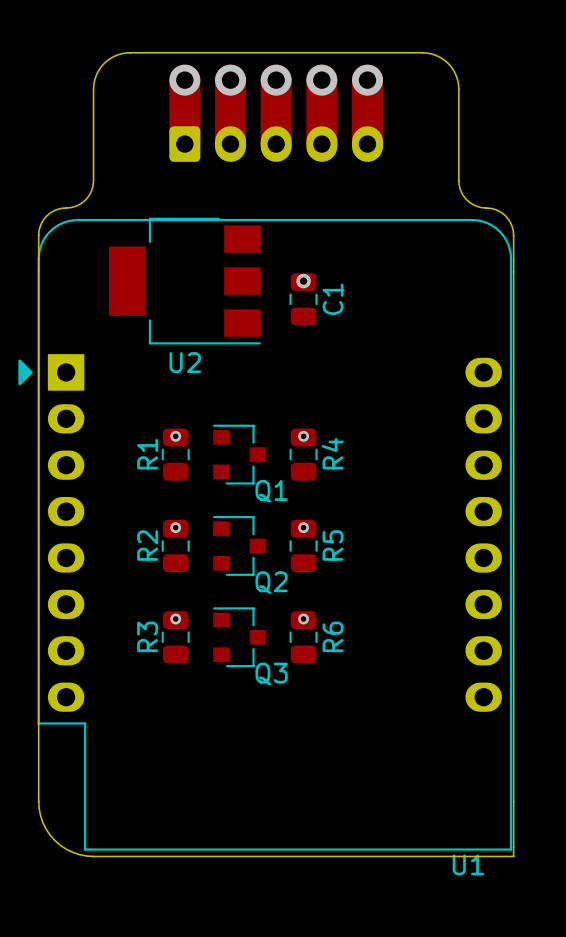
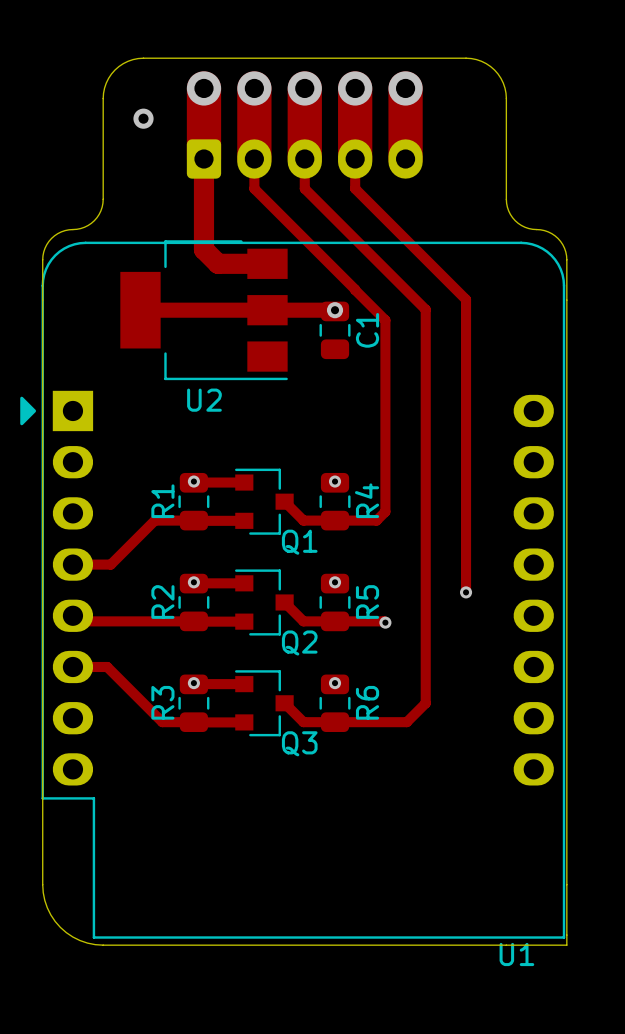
via: none -> (143, 118)
track: none -> (203, 159) (203, 249) (218, 263) (267, 263)
track: none -> (254, 159) (254, 188) (385, 320) (385, 511) (376, 520) (303, 520) (284, 501)
track: none -> (304, 159) (304, 188) (425, 309) (425, 703) (406, 722) (303, 722) (284, 703)
track: none -> (355, 159) (355, 188) (466, 299) (466, 592)
track: none -> (140, 310) (335, 310)
track: none -> (194, 482) (244, 482)
track: none -> (193, 520) (154, 520) (110, 564) (72, 564)
track: none -> (194, 520) (244, 520)
track: none -> (193, 582) (244, 583)
via: none -> (466, 592)
track: none -> (284, 602) (303, 621) (385, 622)
track: none -> (72, 615) (78, 621) (193, 621)
track: none -> (194, 621) (244, 621)
via: none -> (385, 622)
track: none -> (72, 666) (107, 666) (162, 722) (193, 722)
track: none -> (193, 683) (244, 684)
track: none -> (194, 722) (244, 722)

